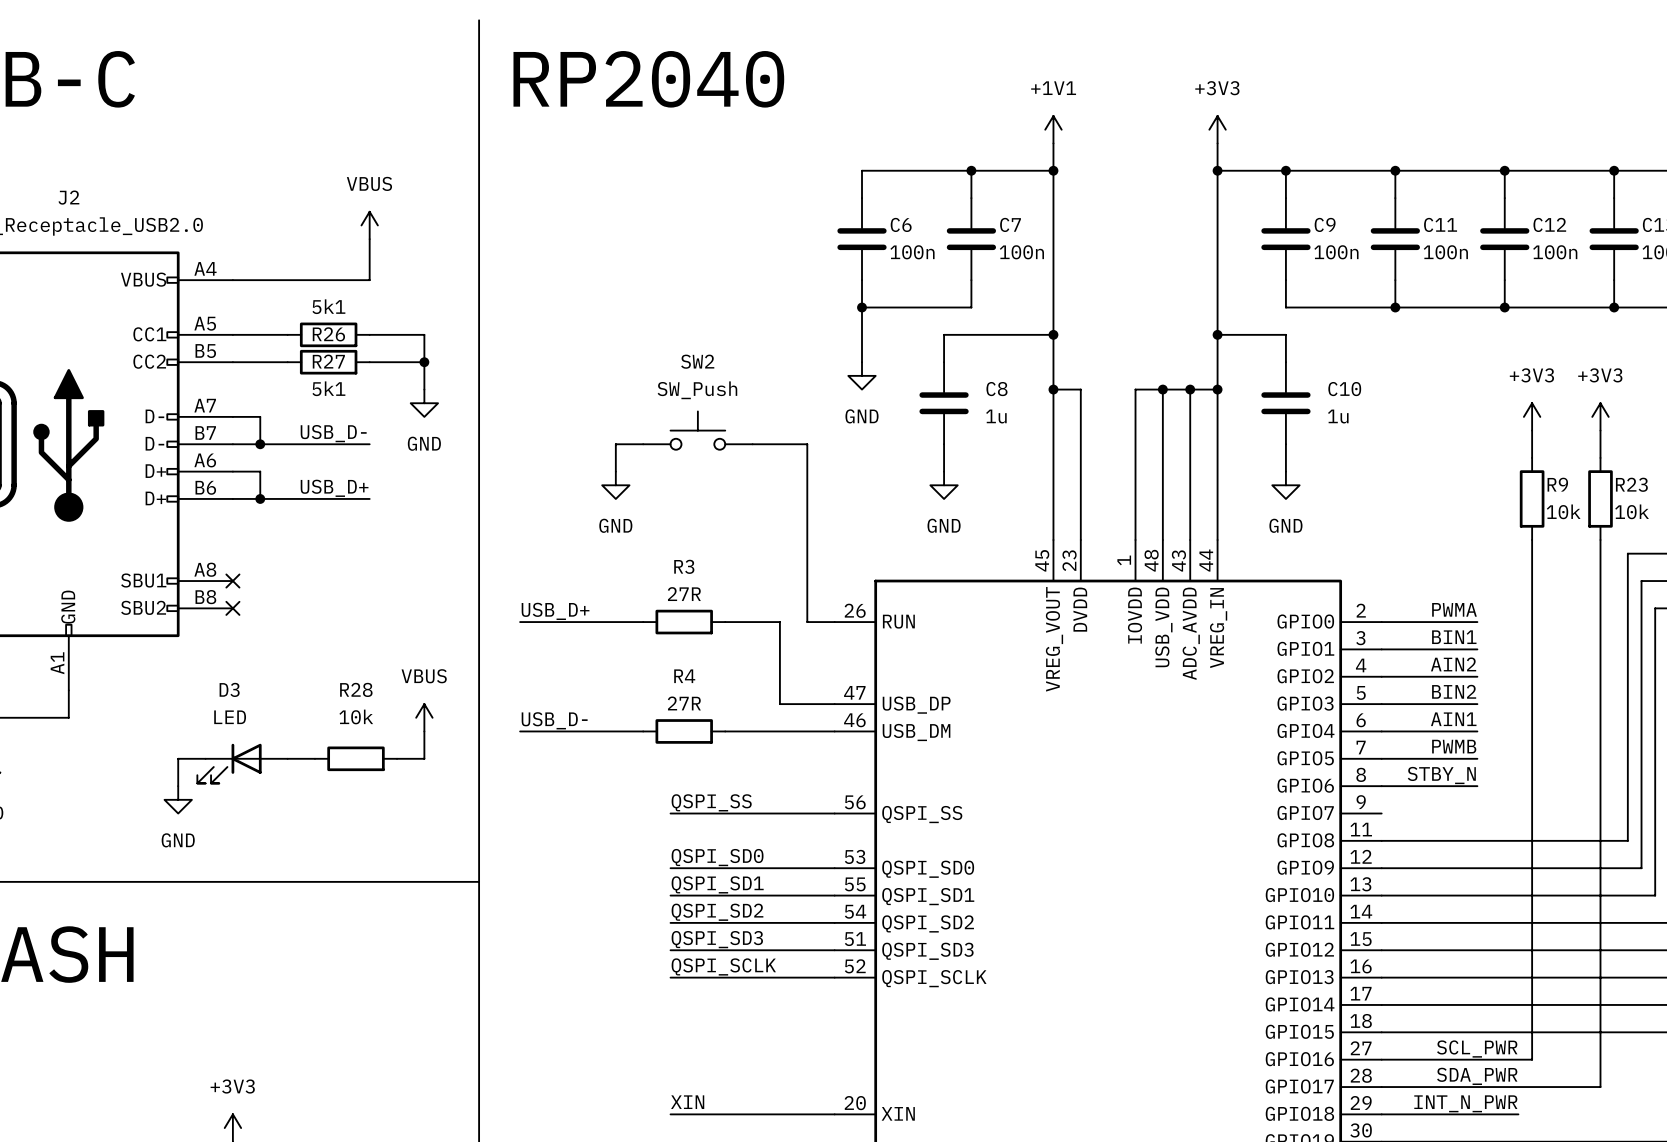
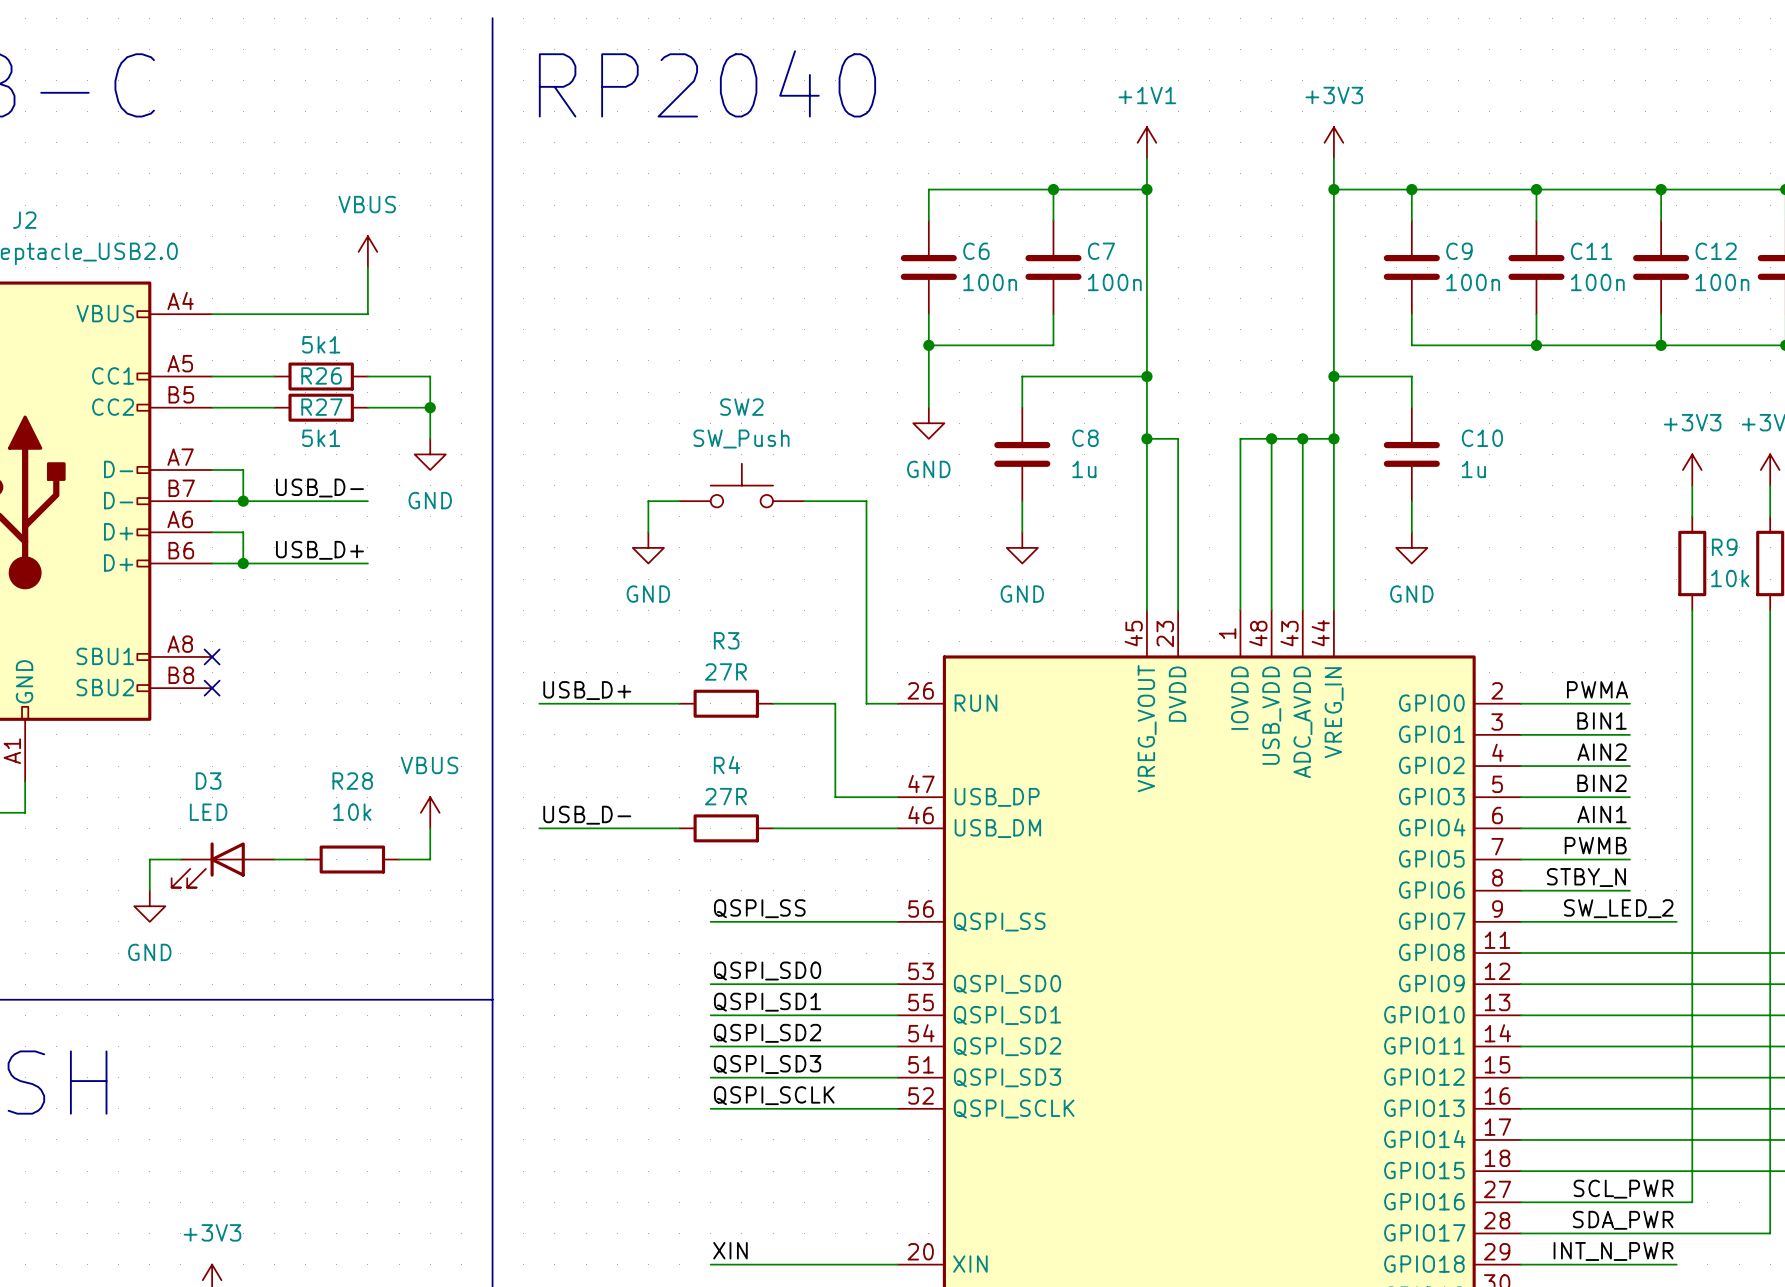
label: none -> SW_LED_2 (1618, 908)
wire: none -> (1520, 921) (1676, 921)

